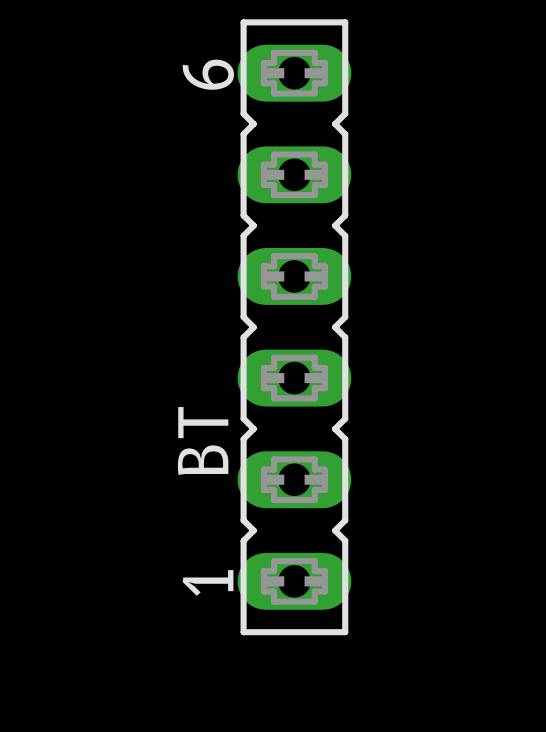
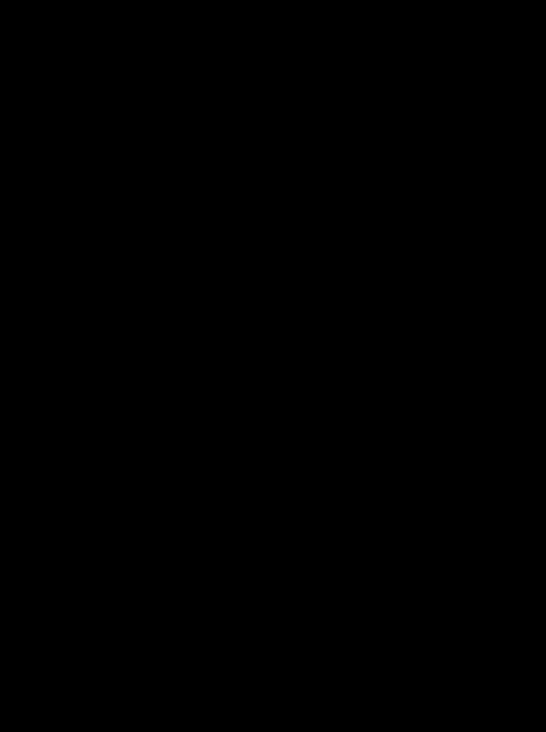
BT: (294, 327) -> none

